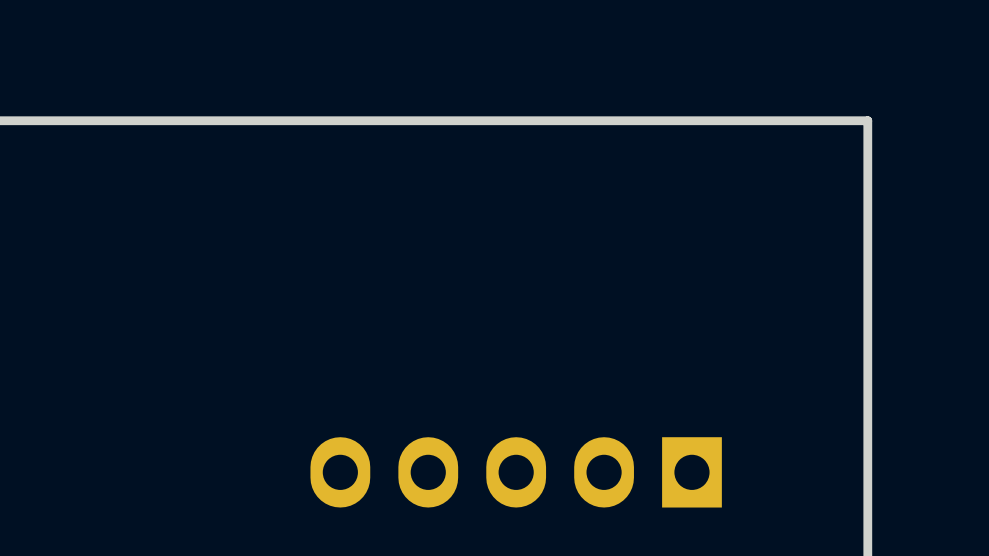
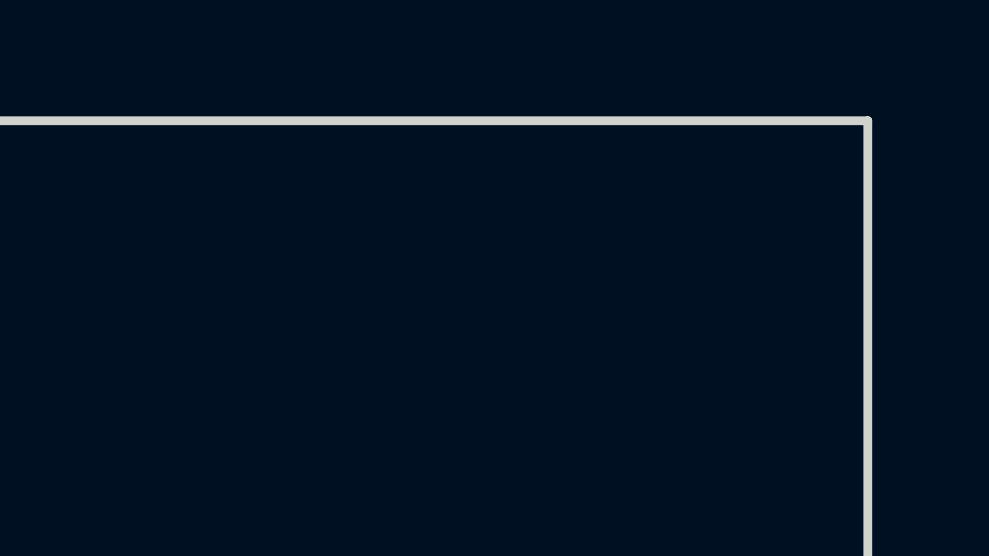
part: (516, 472) -> none

